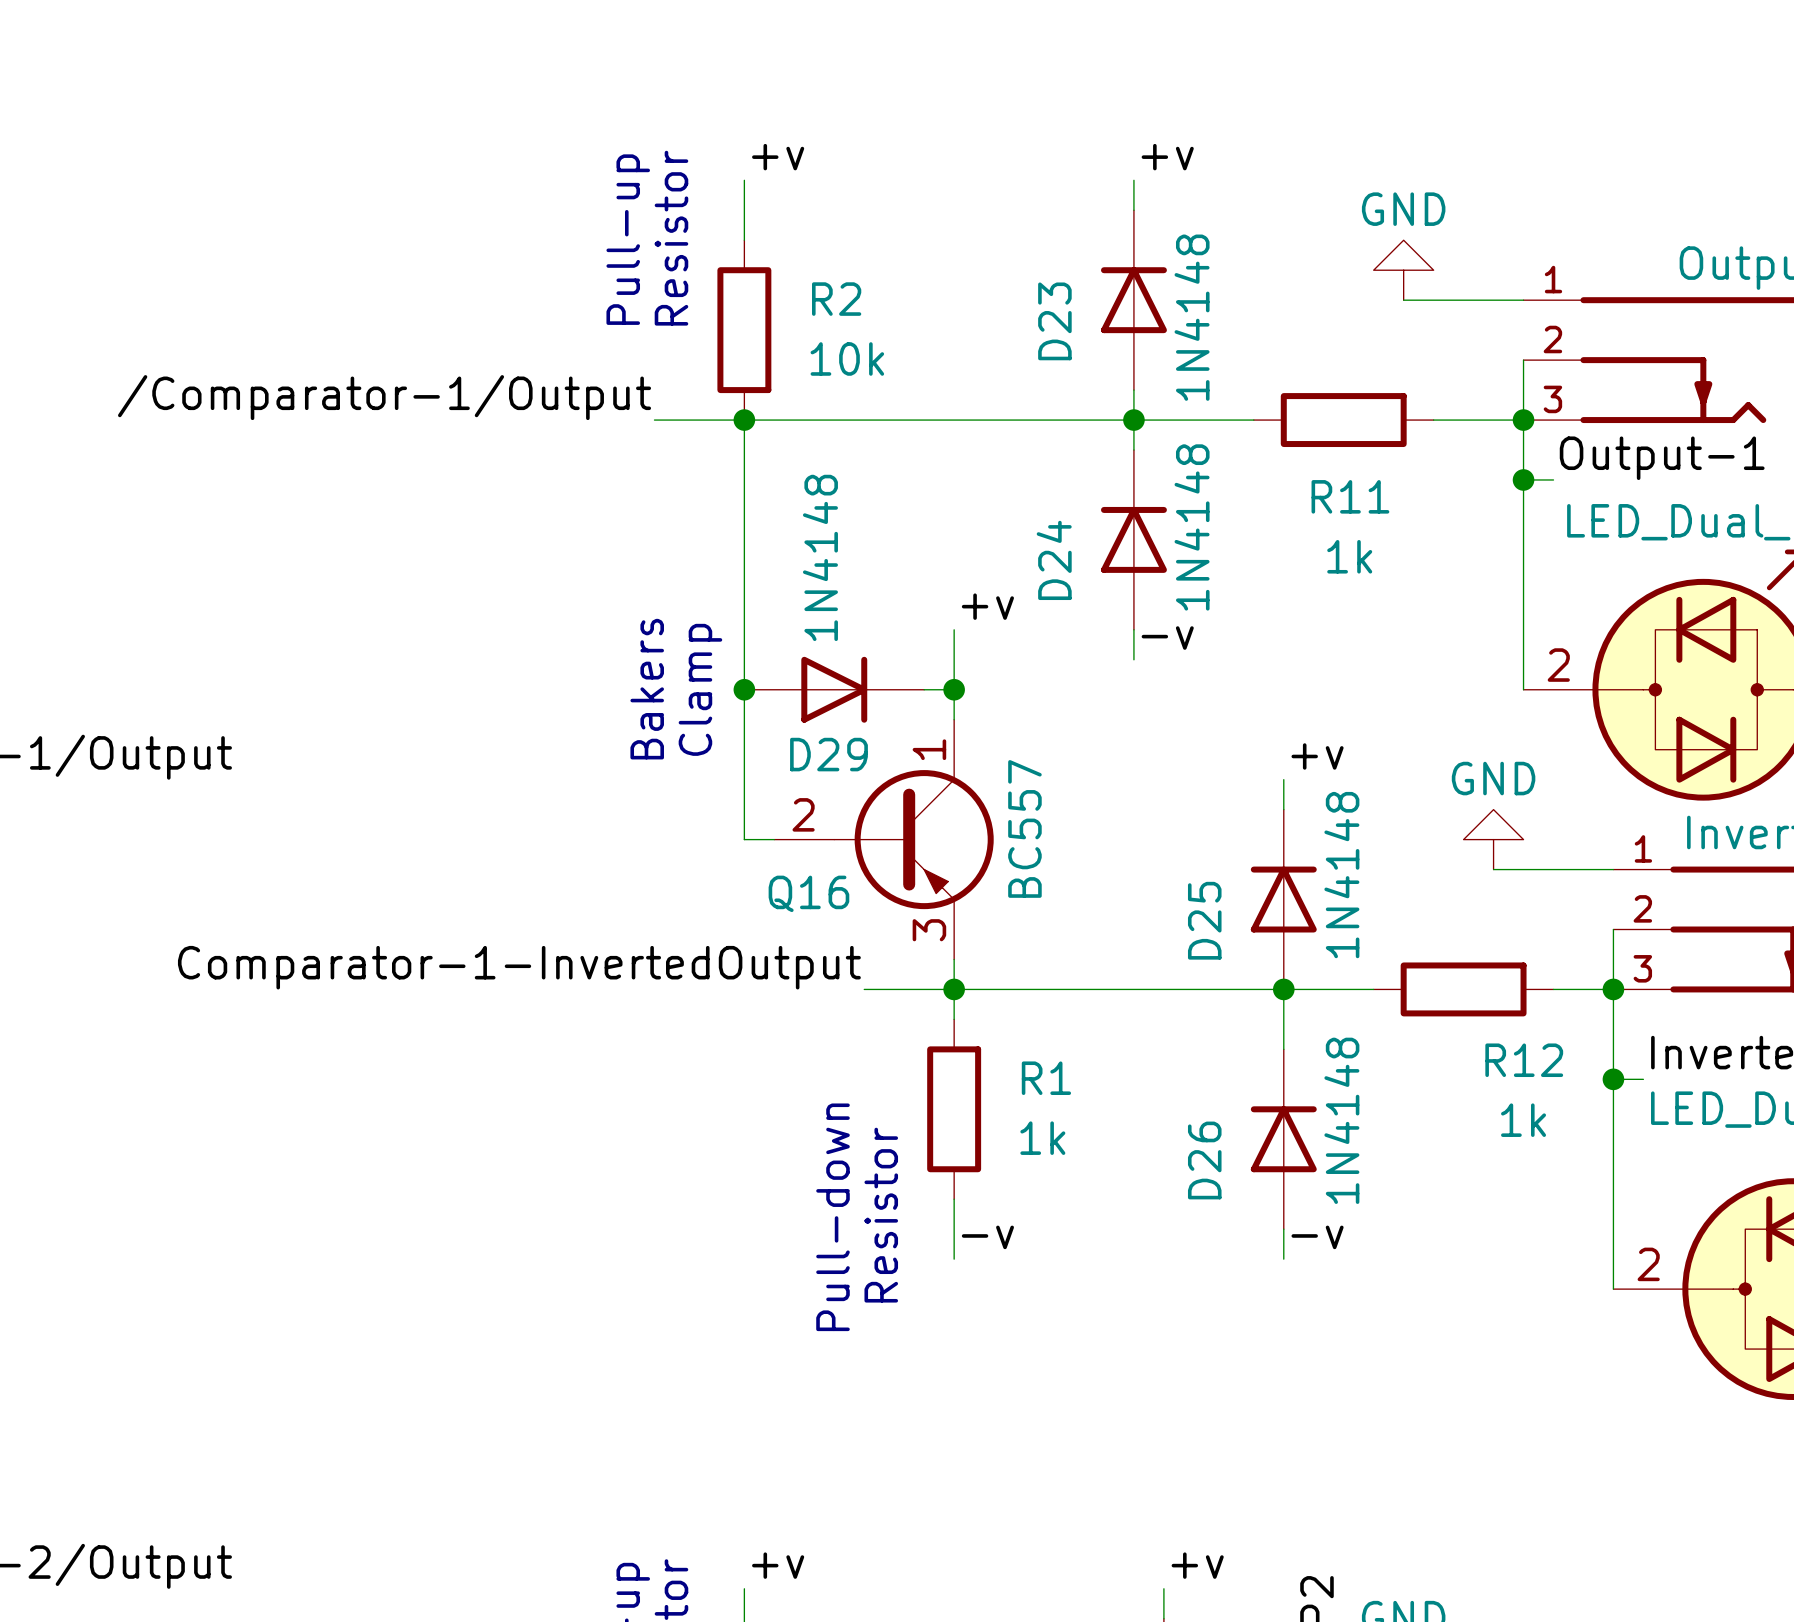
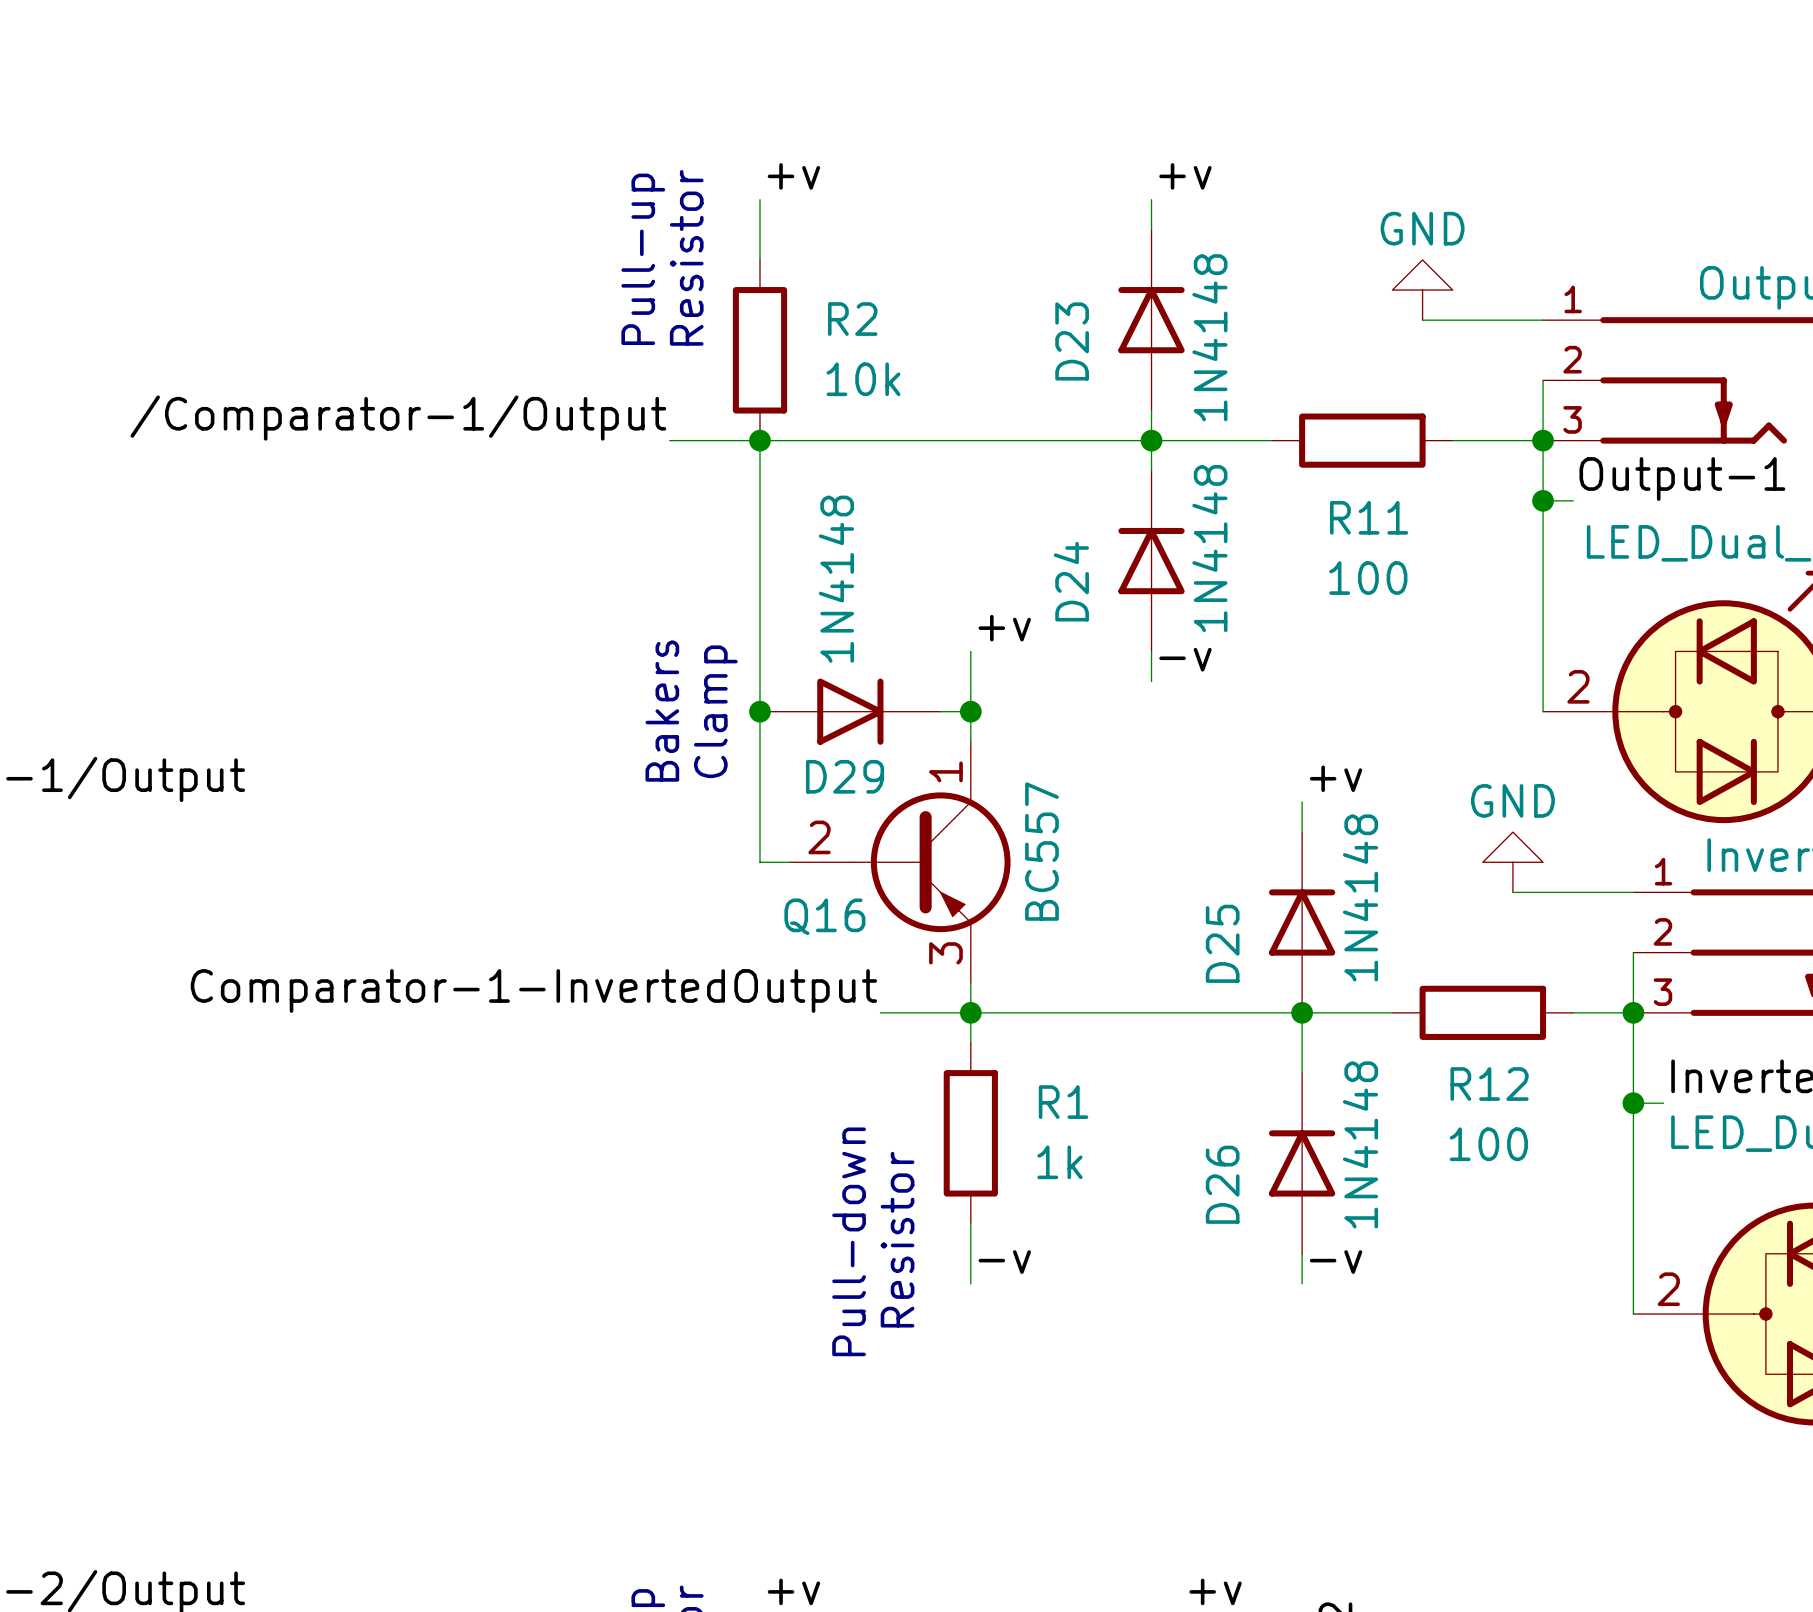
R11 value: 1k (1349, 556) -> 100 (1368, 578)
R12 name position: R12 (1524, 1060) -> R12 (1489, 1084)
R12 value: 1k (1523, 1120) -> 100 (1488, 1144)

